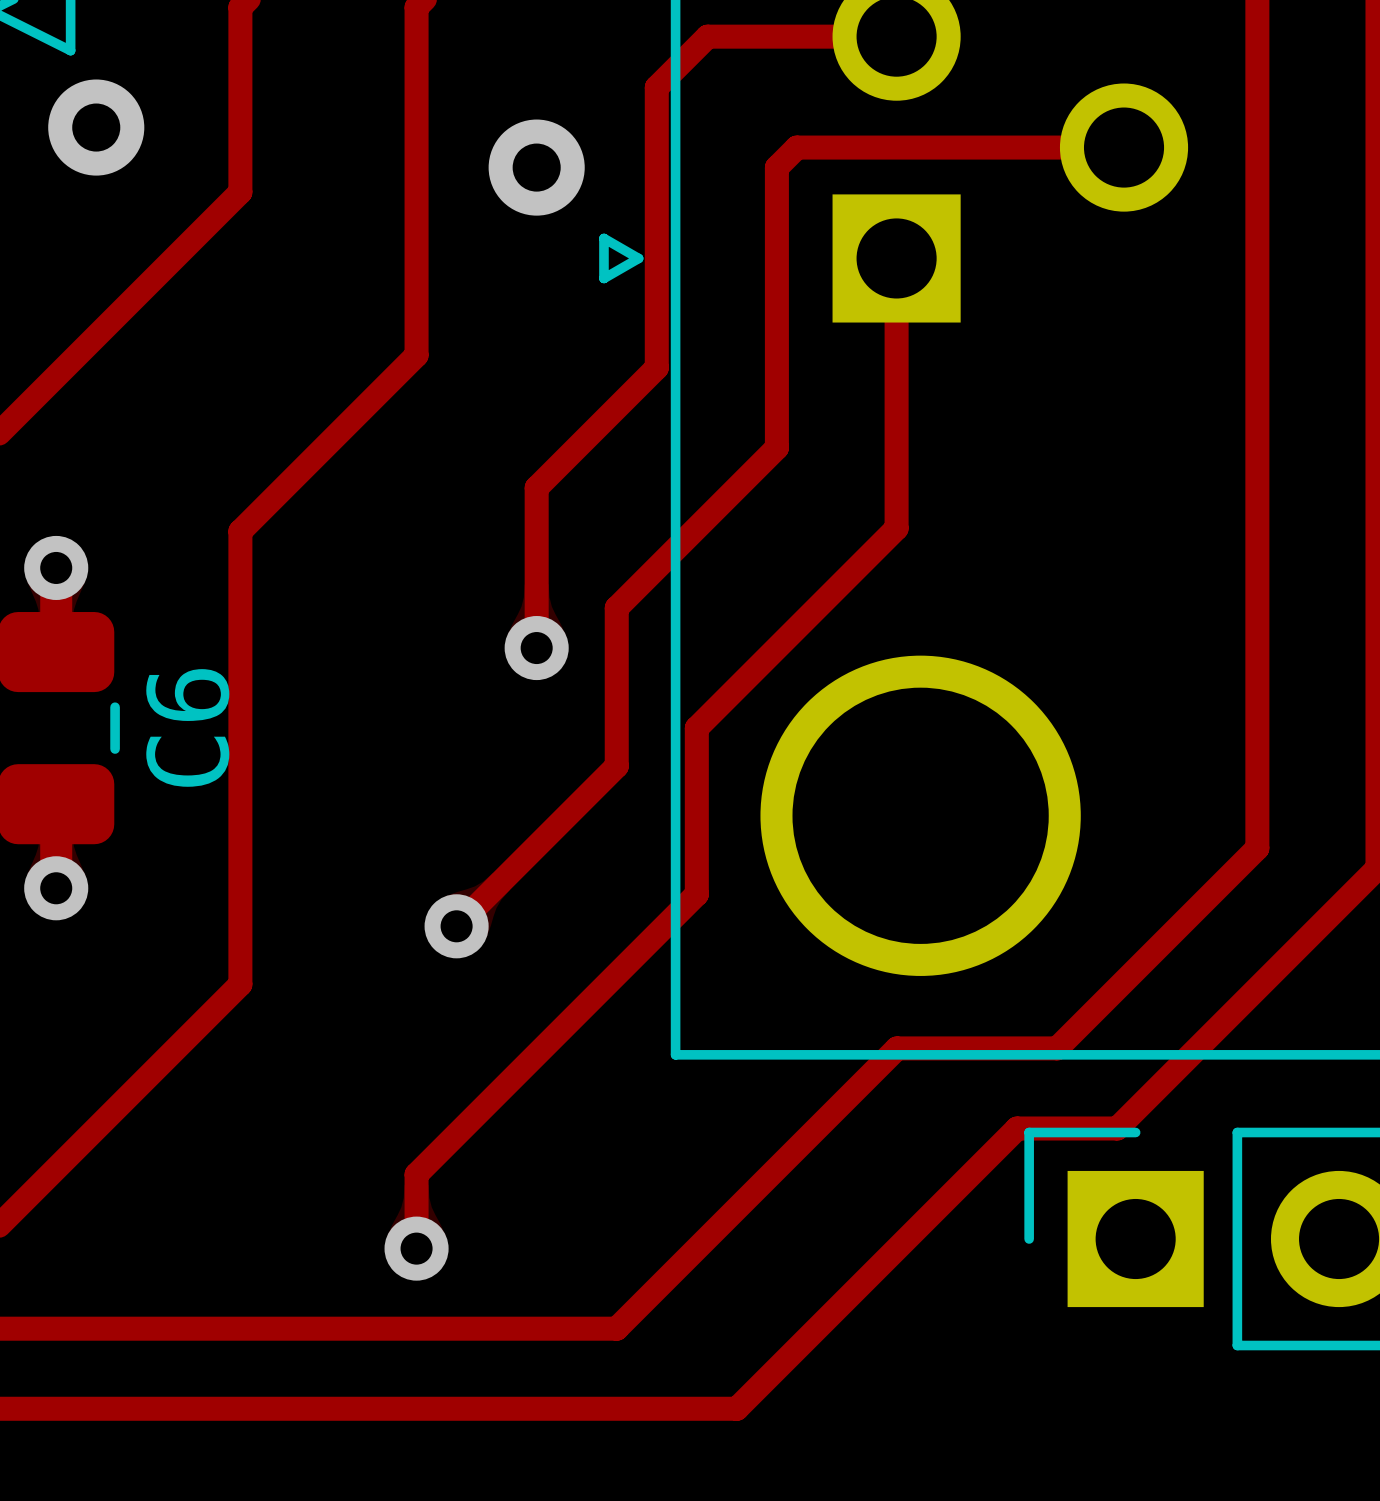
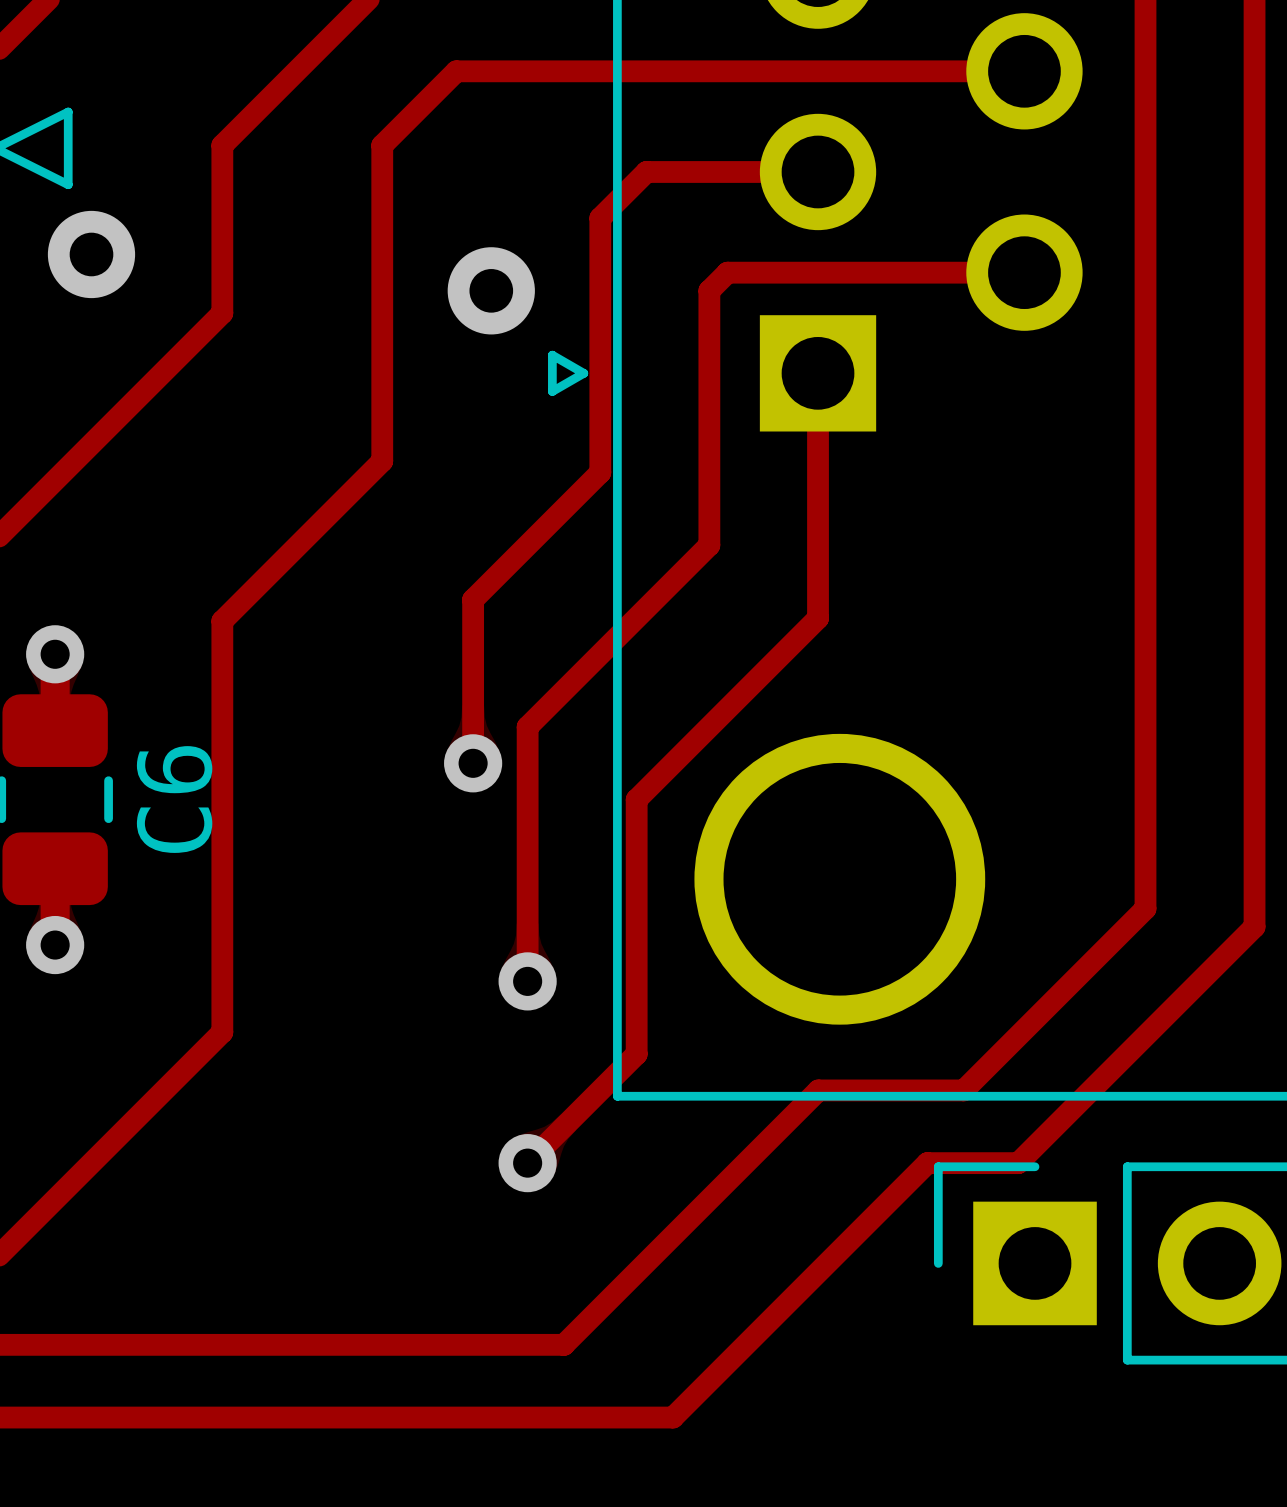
track: (536, 487) (536, 648) -> (491, 581) (473, 599) (473, 763)
track: (616, 608) (616, 766) (456, 926) -> (563, 690) (527, 726) (527, 981)
via position: (536, 648) -> (473, 763)
track: (696, 894) (416, 1174) (416, 1248) -> (636, 950) (636, 1054) (527, 1163)
via: (456, 926) -> none
via: none -> (527, 981)
via: none -> (527, 1163)
via: (416, 1248) -> none

